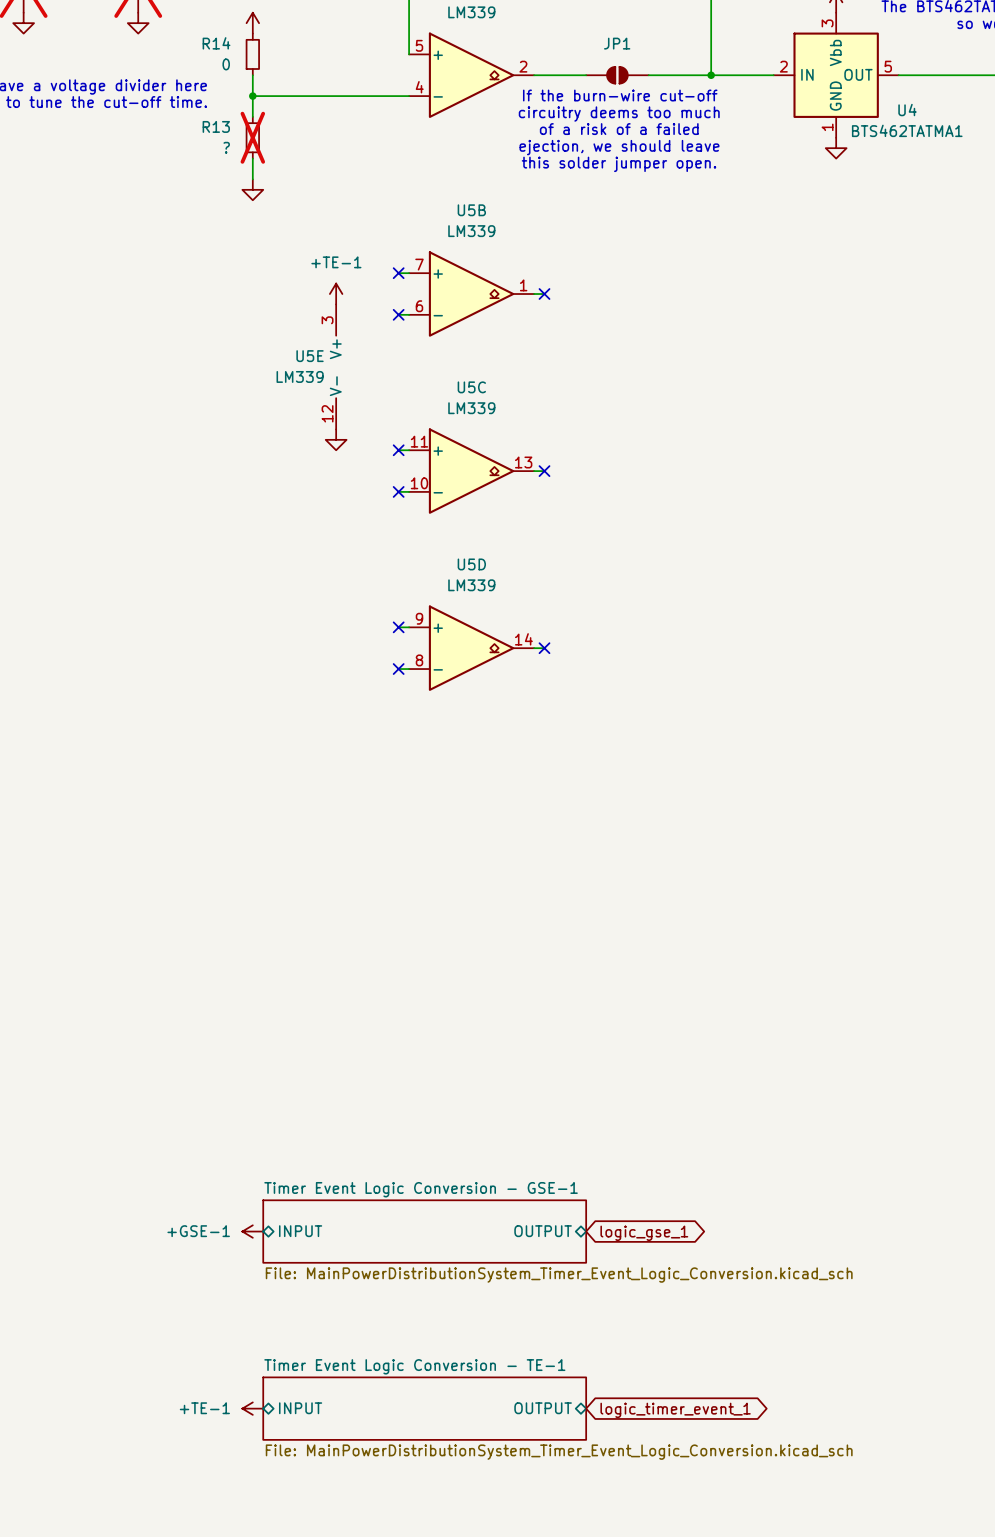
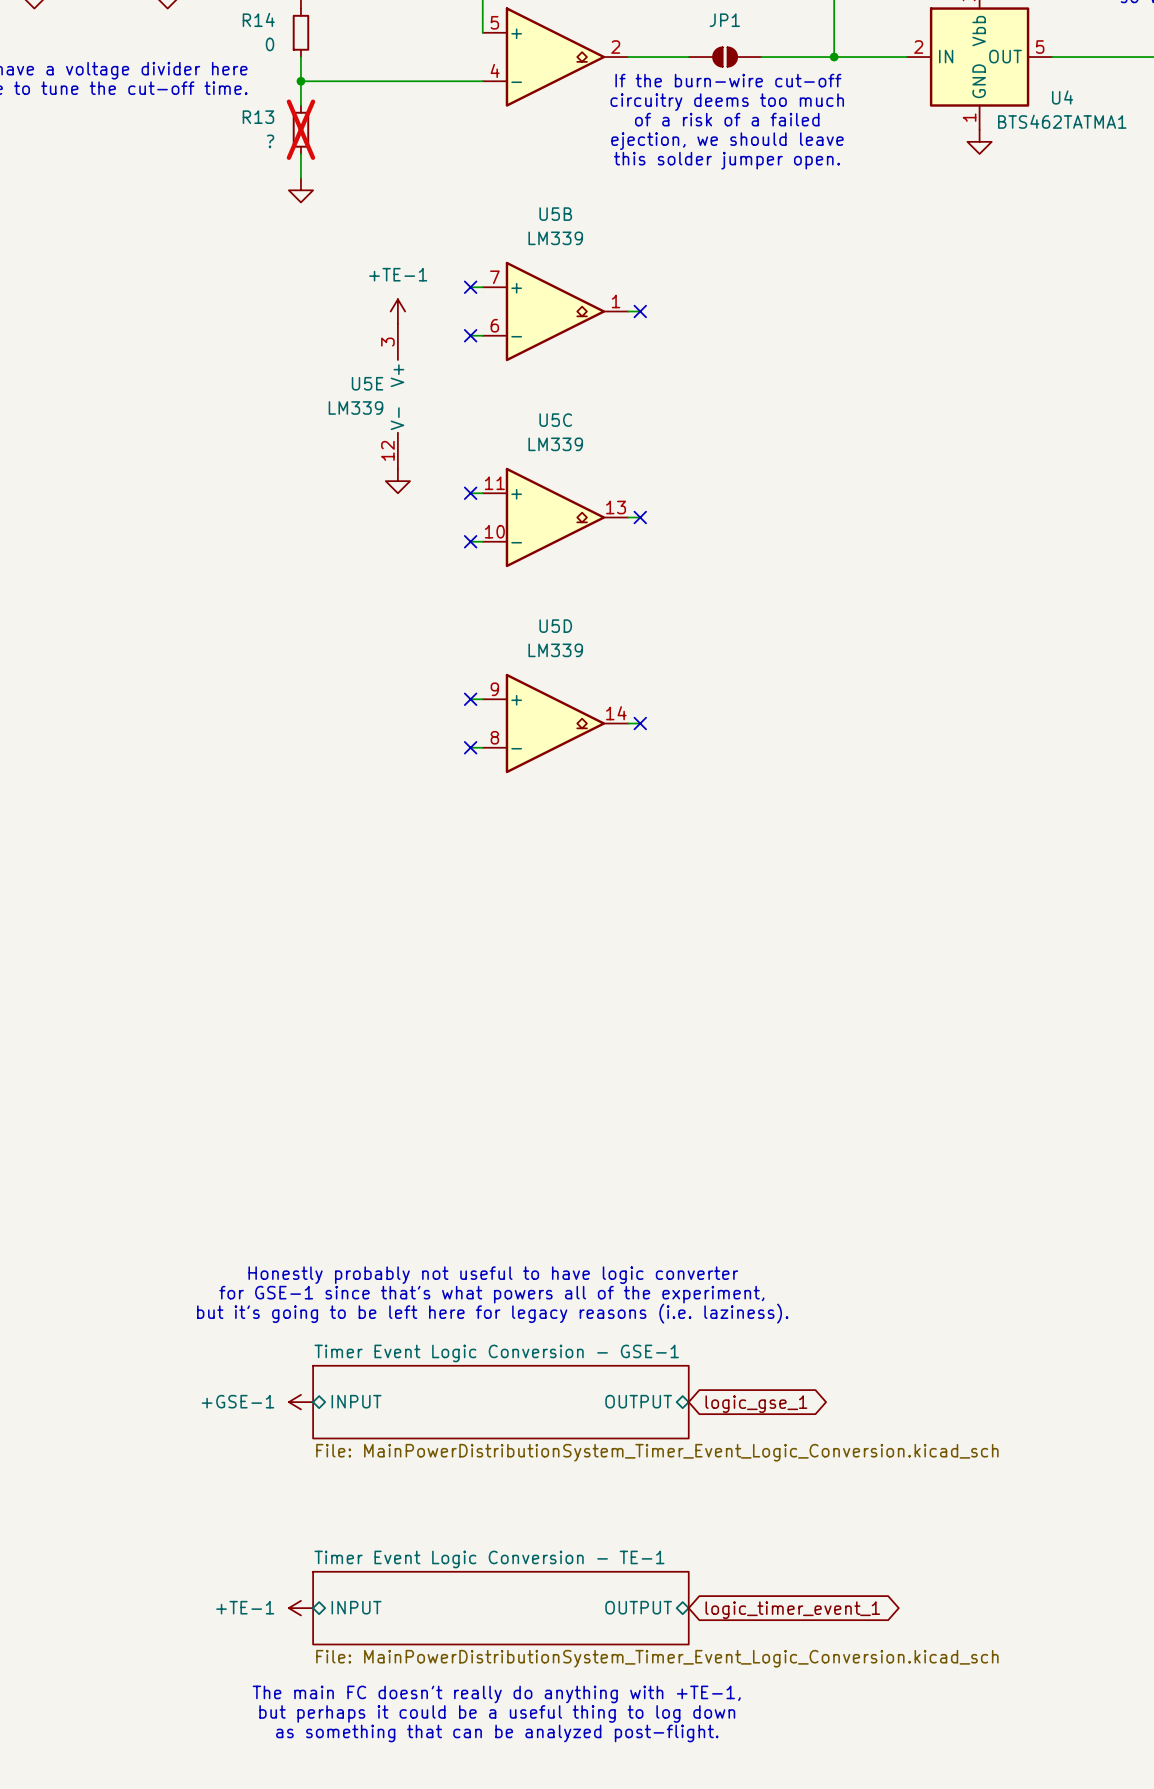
text: none -> Honestly probably not useful to have logic converter (493, 1275)
text: none -> for GSE-1 since that's what powers all of the experiment, (491, 1294)
text: none -> but it's going to be left here for legacy reasons (i.e. laziness). (492, 1313)
text: none -> The main FC doesn't really do anything with +TE-1, (496, 1694)
text: none -> but perhaps it could be a useful thing to log down (497, 1713)
text: none -> as something that can be analyzed post-flight. (497, 1733)

